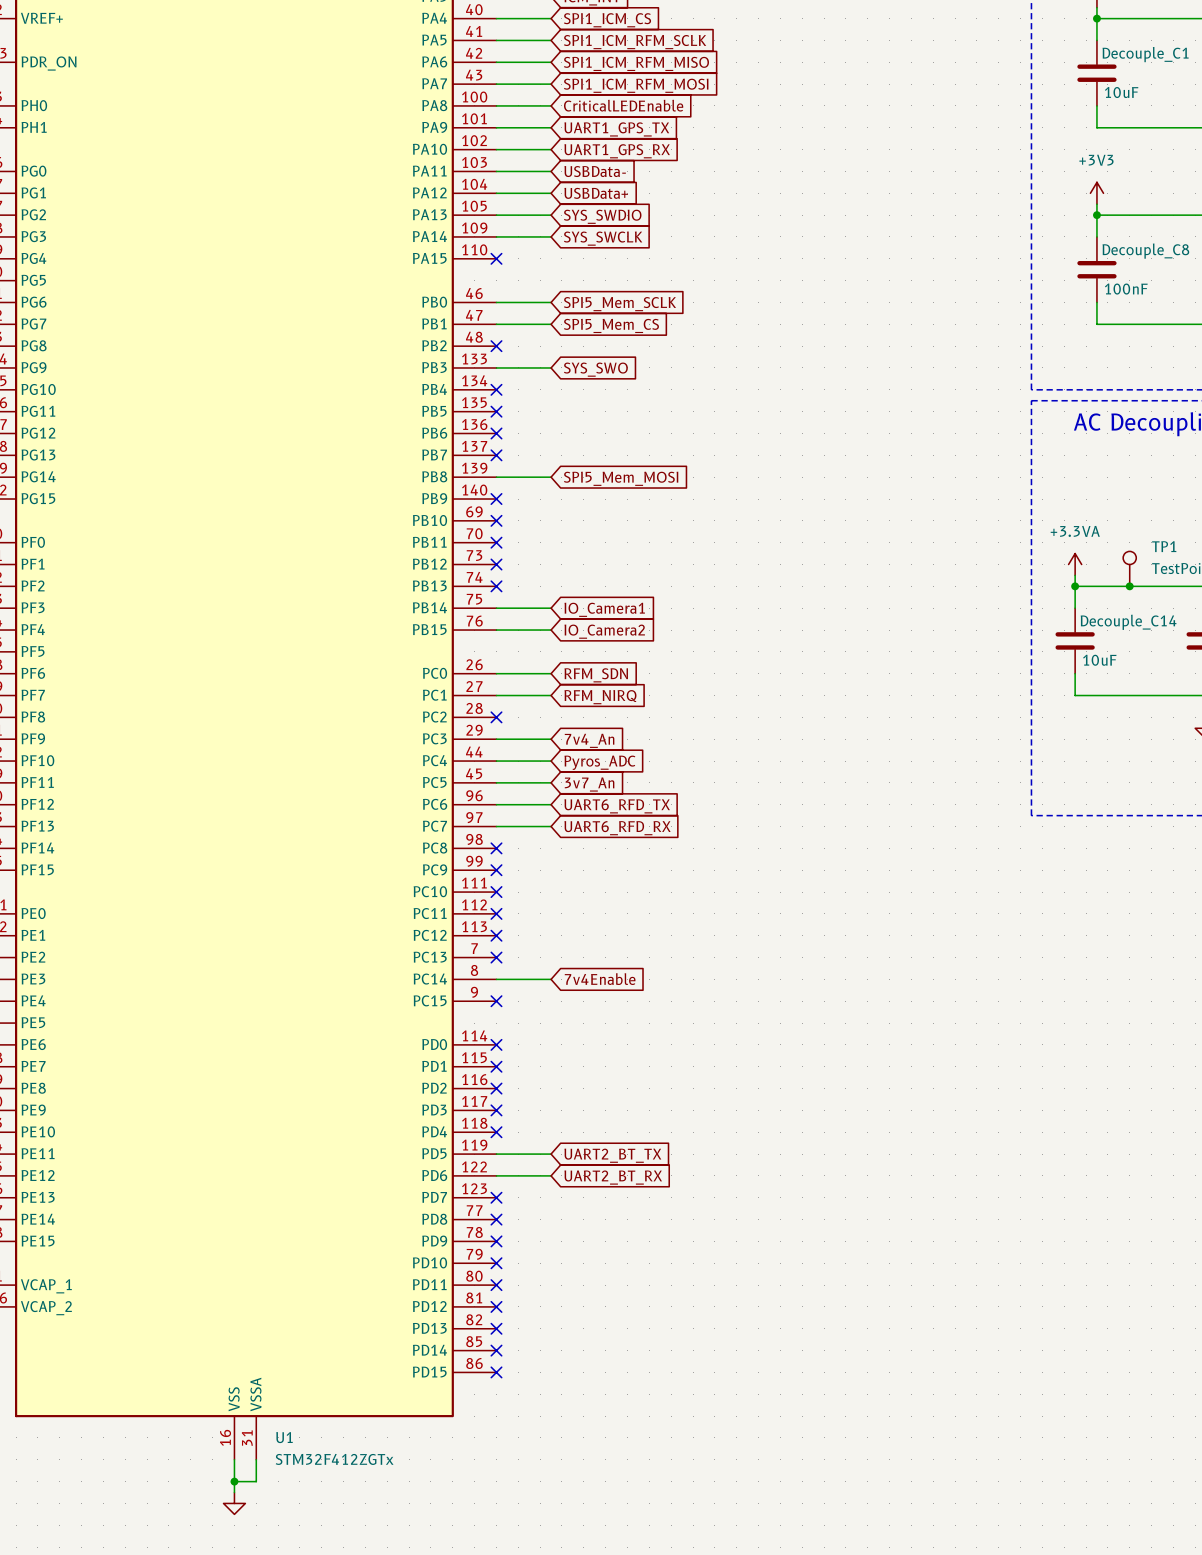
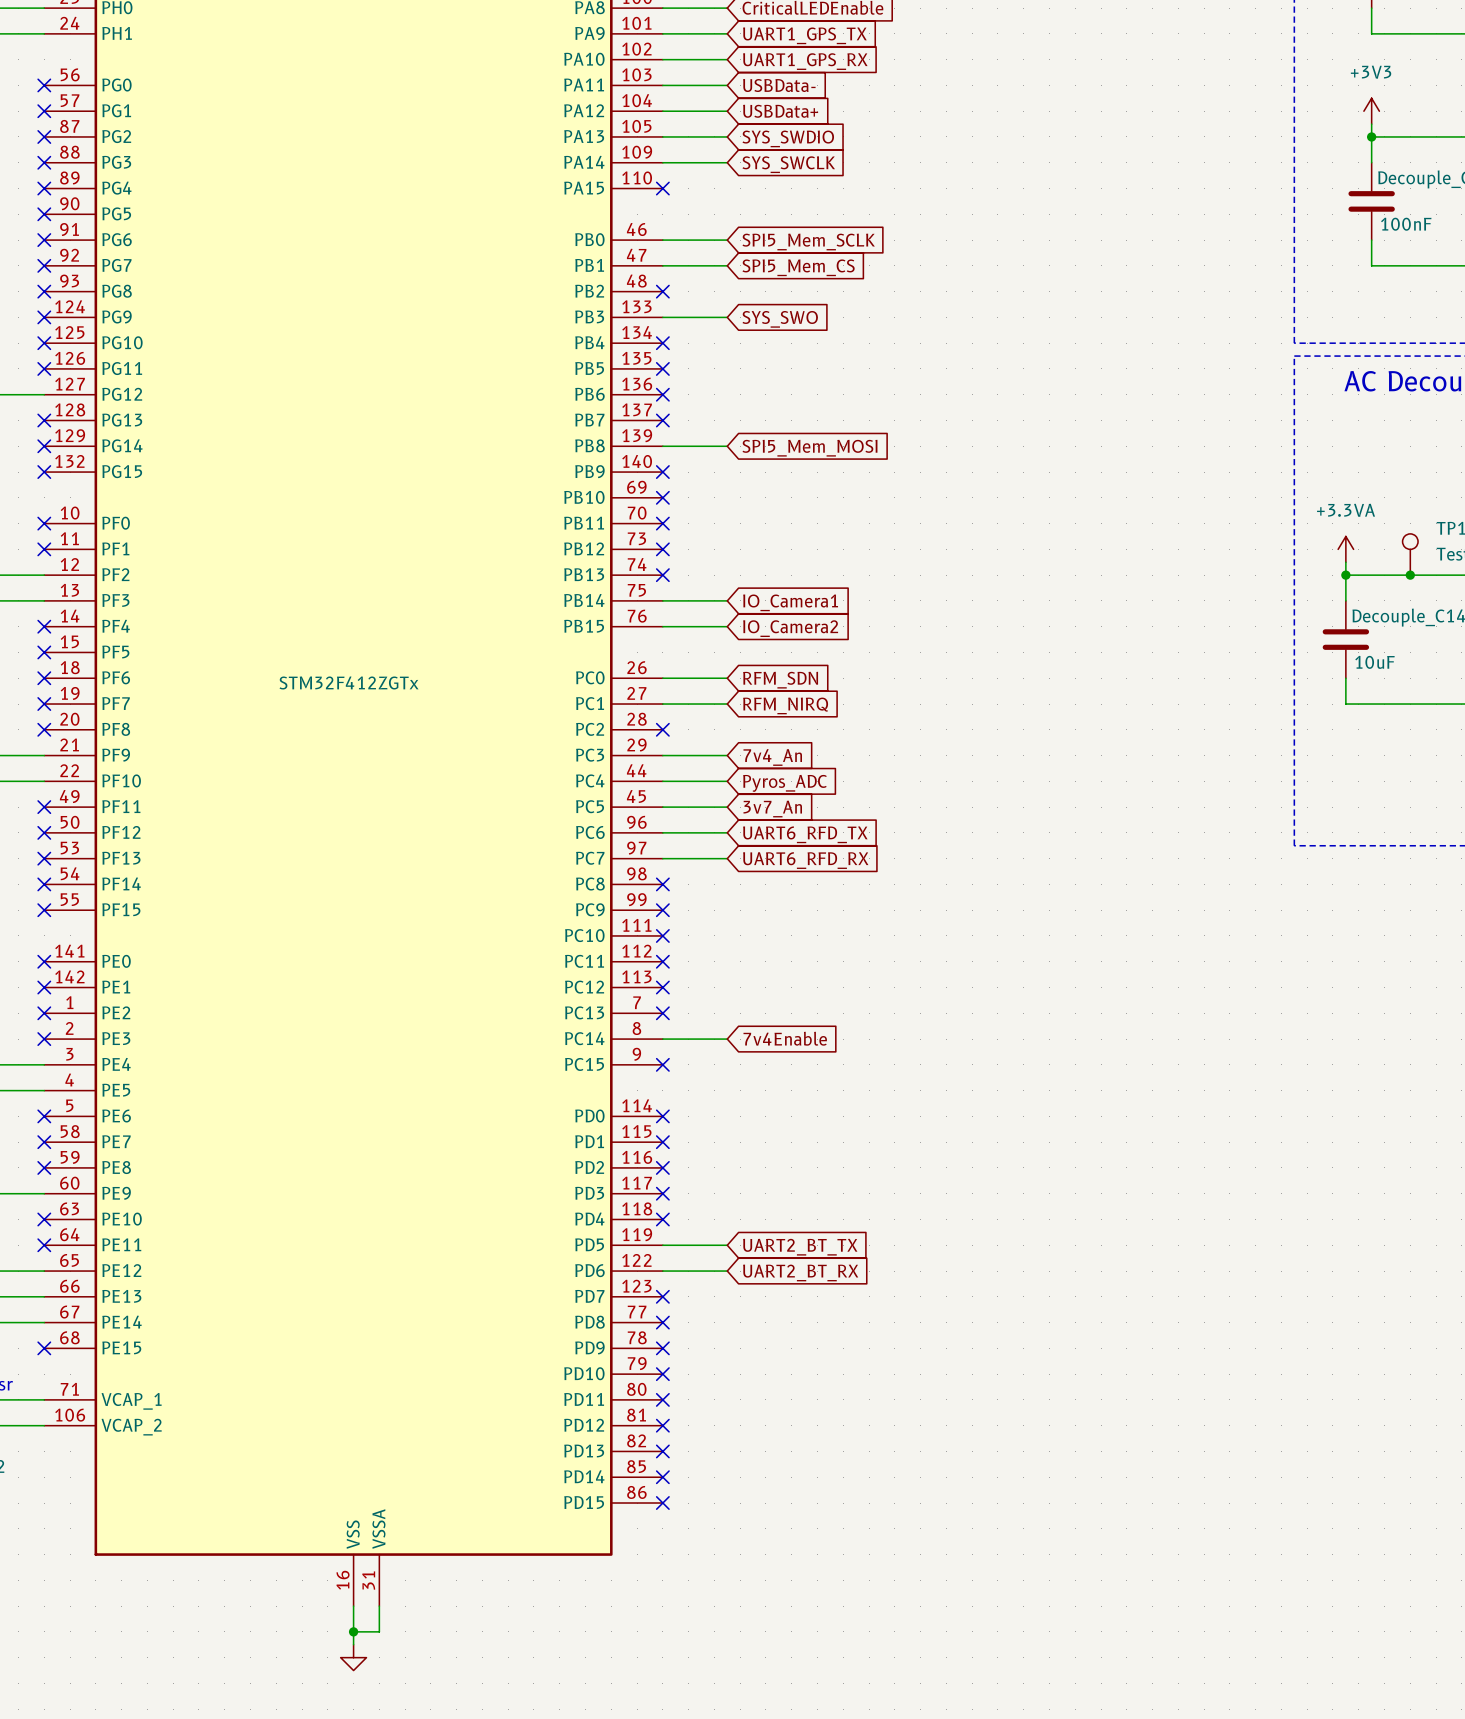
U1 name: U1 (284, 1437) -> none
U1 value position: STM32F412ZGTx (334, 1459) -> STM32F412ZGTx (349, 682)

